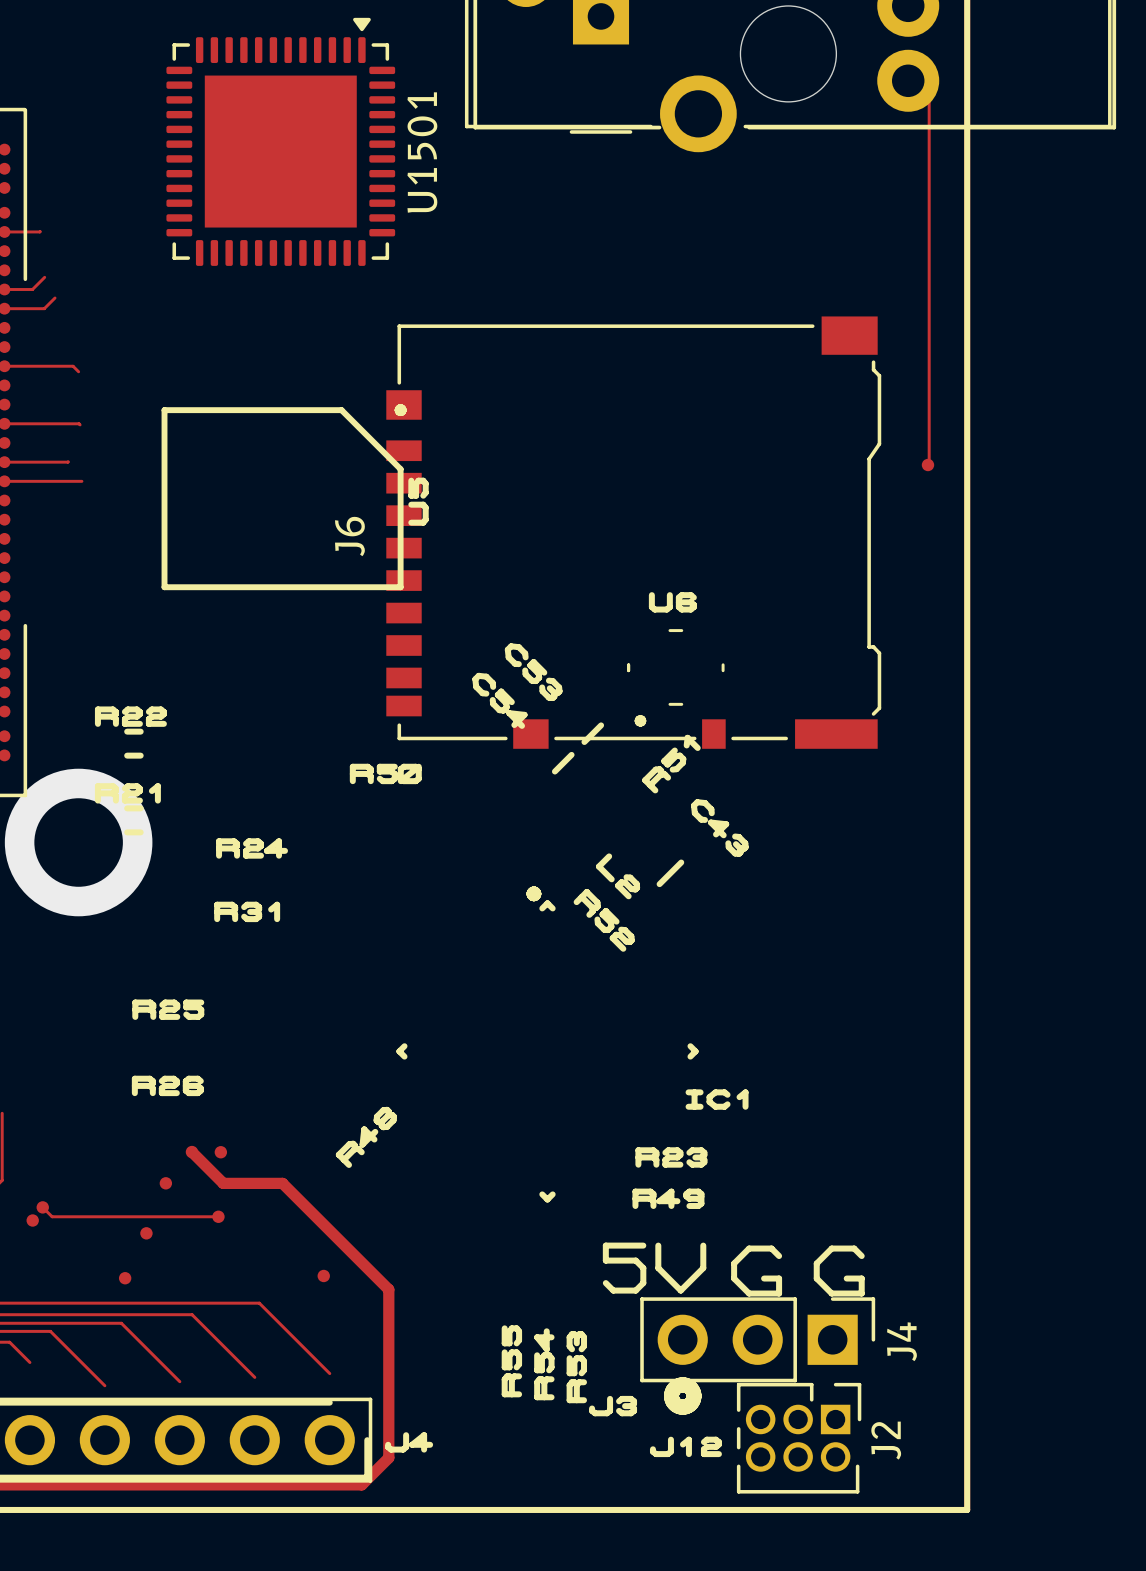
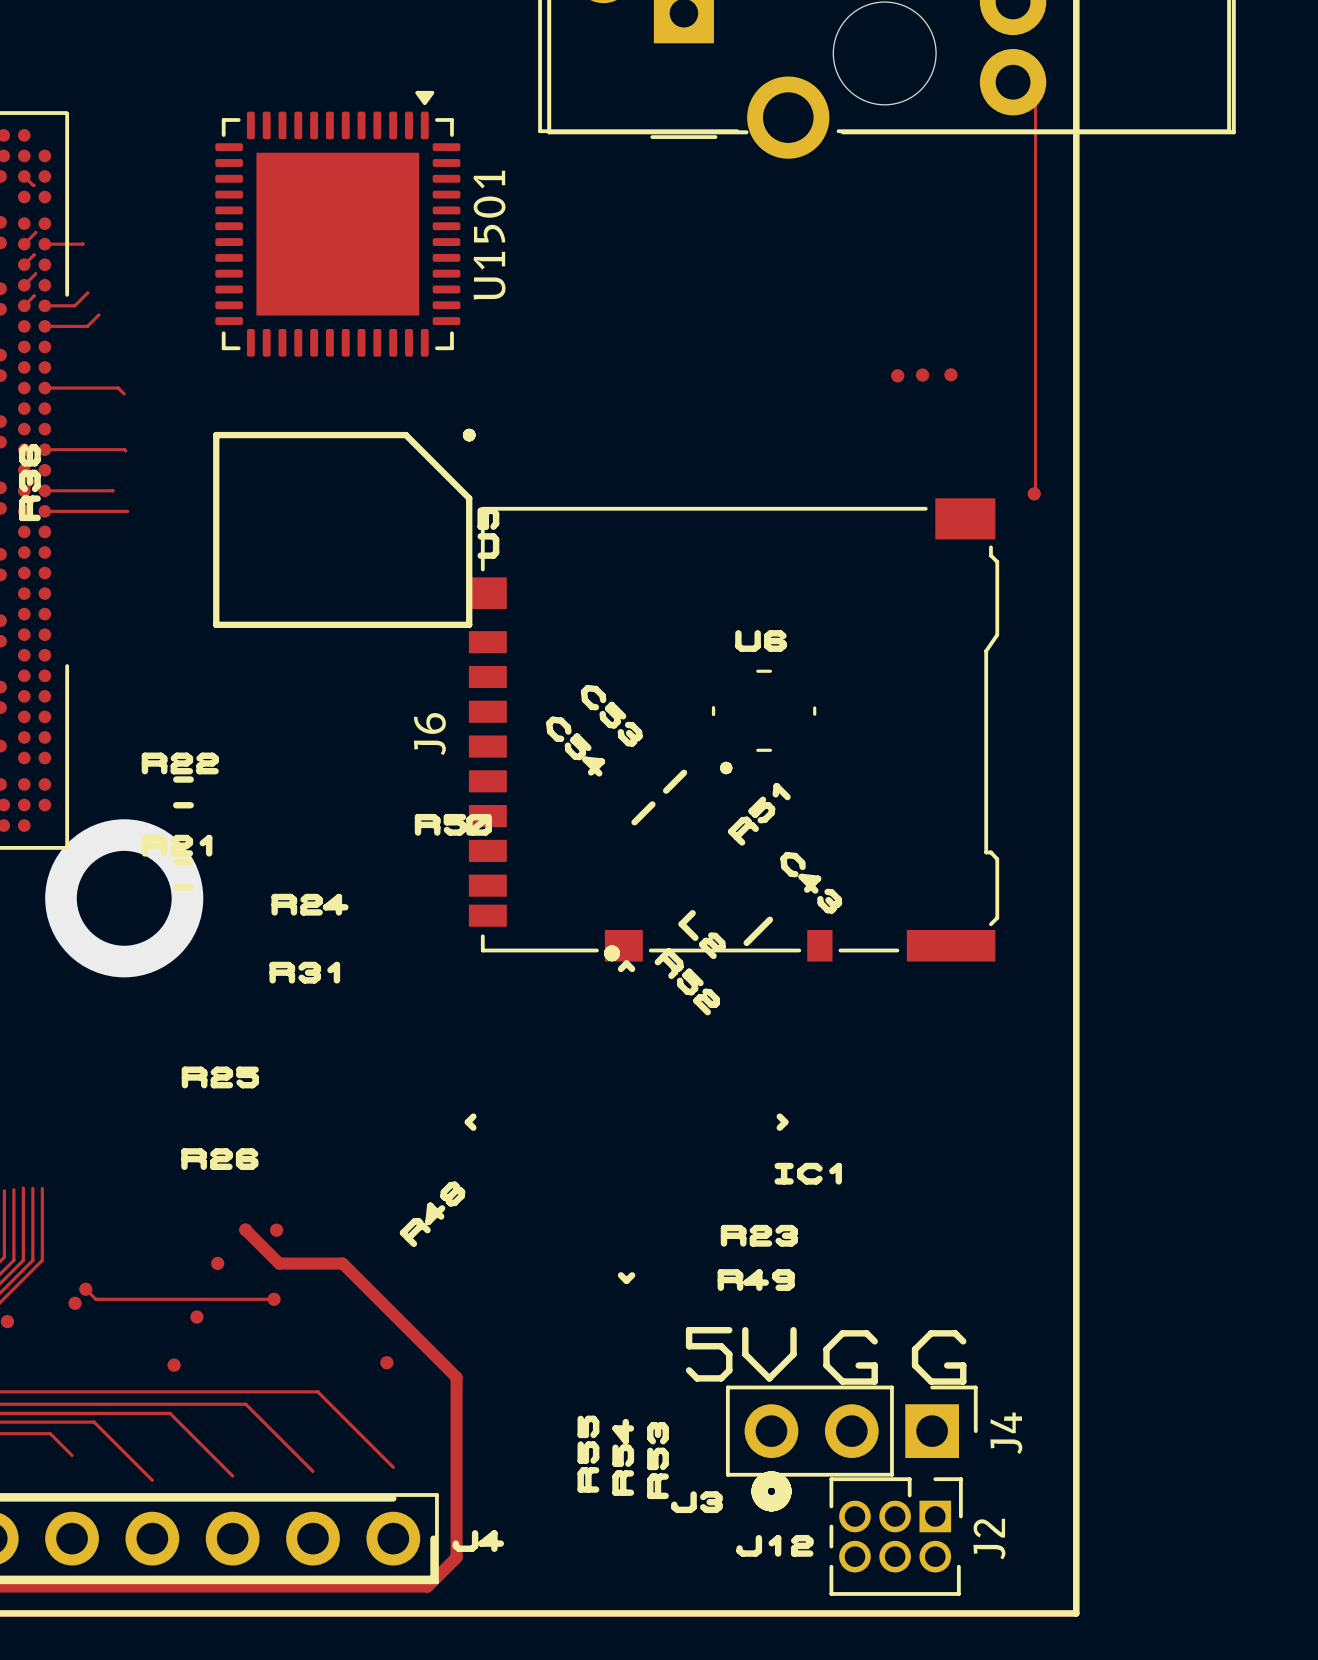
U1501 position: (280, 141) -> (337, 223)
drawing: none -> [891, 368, 958, 383]
J6 position: (633, 532) -> (734, 729)

